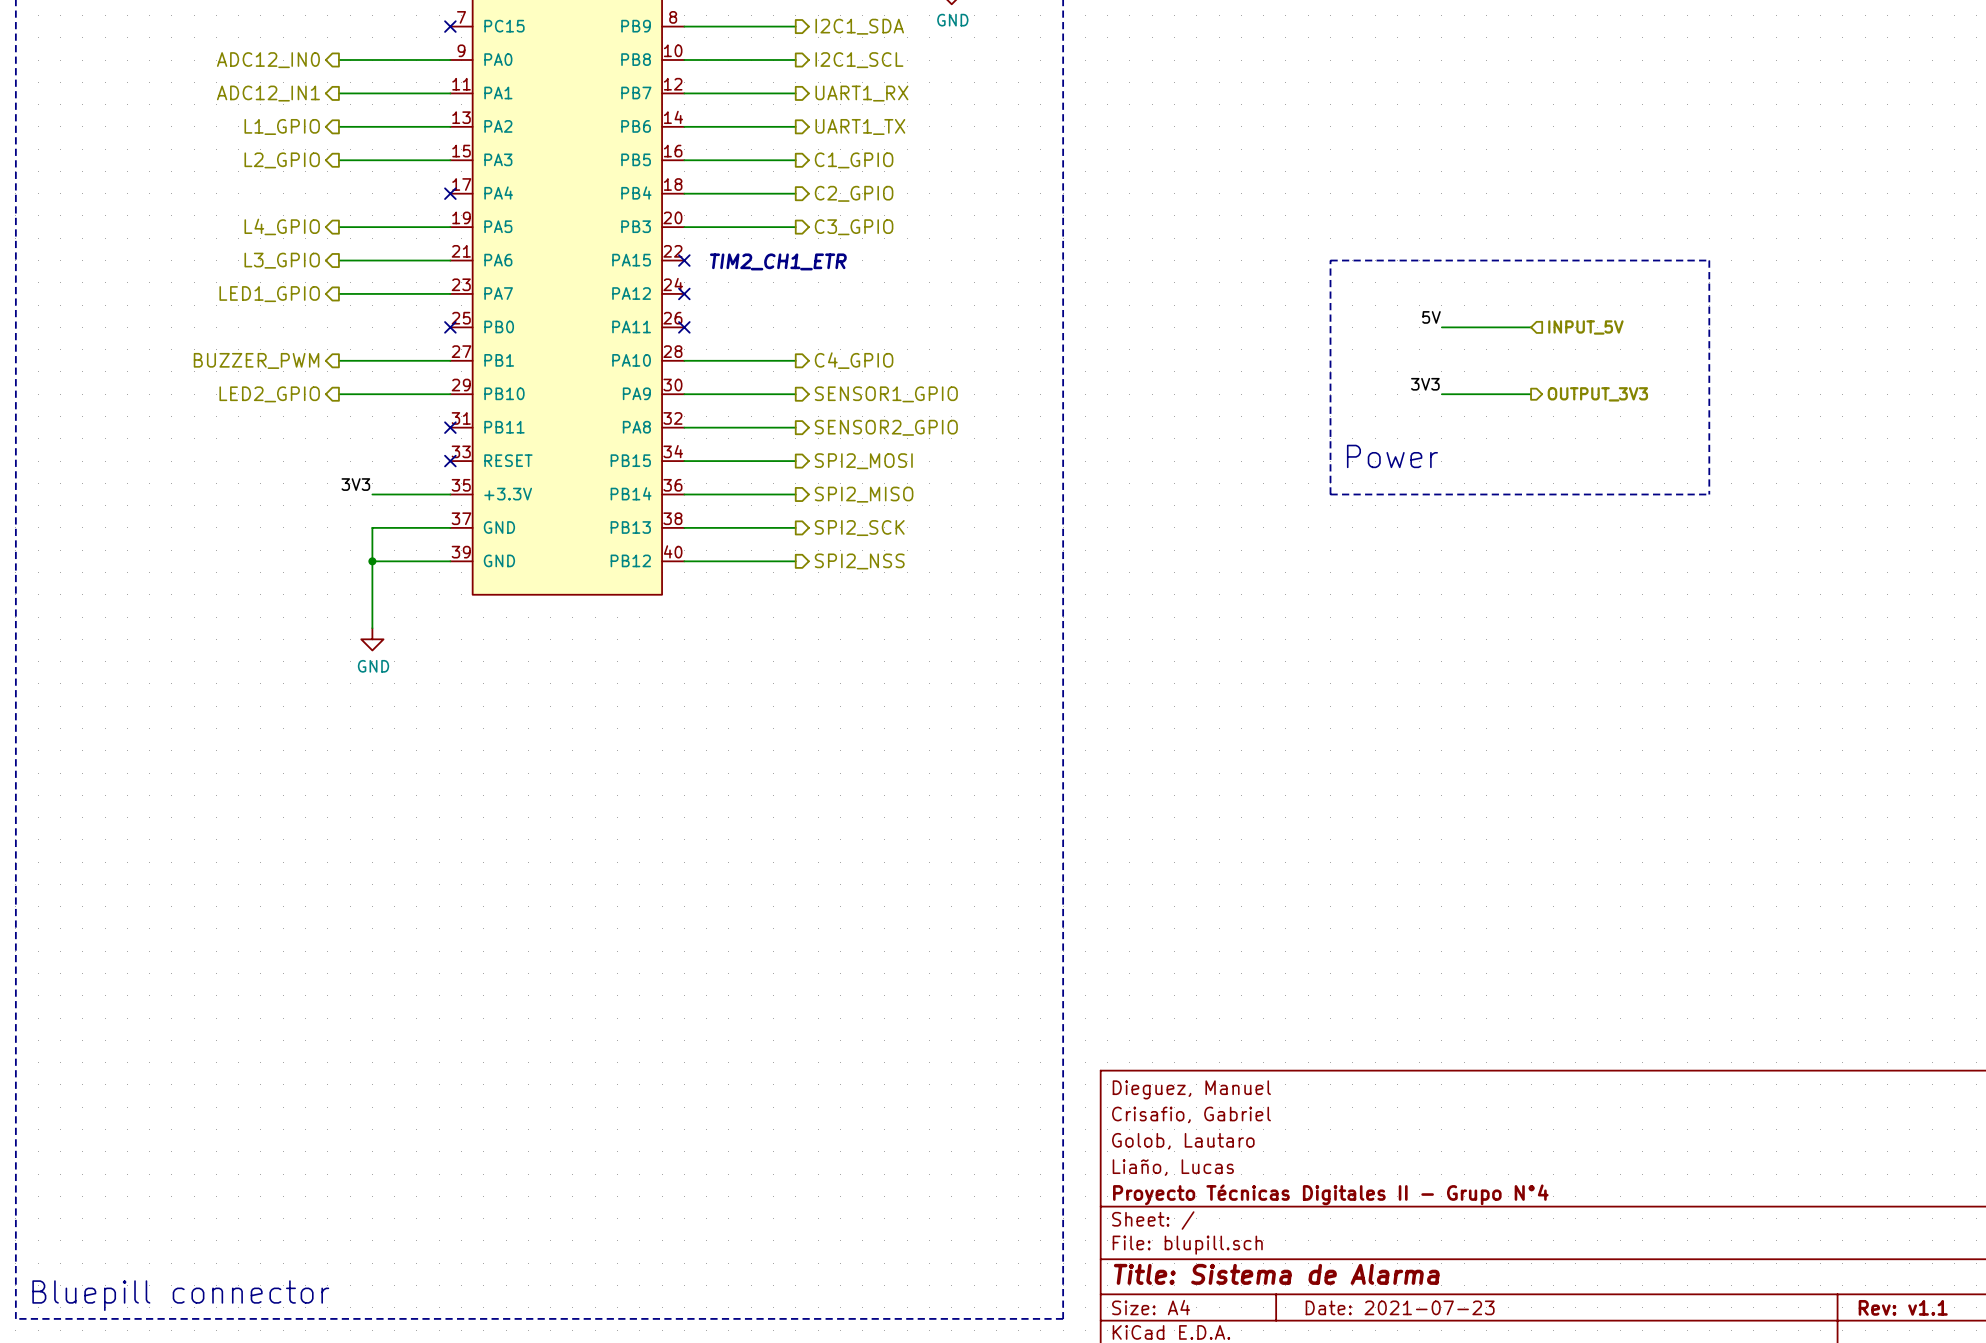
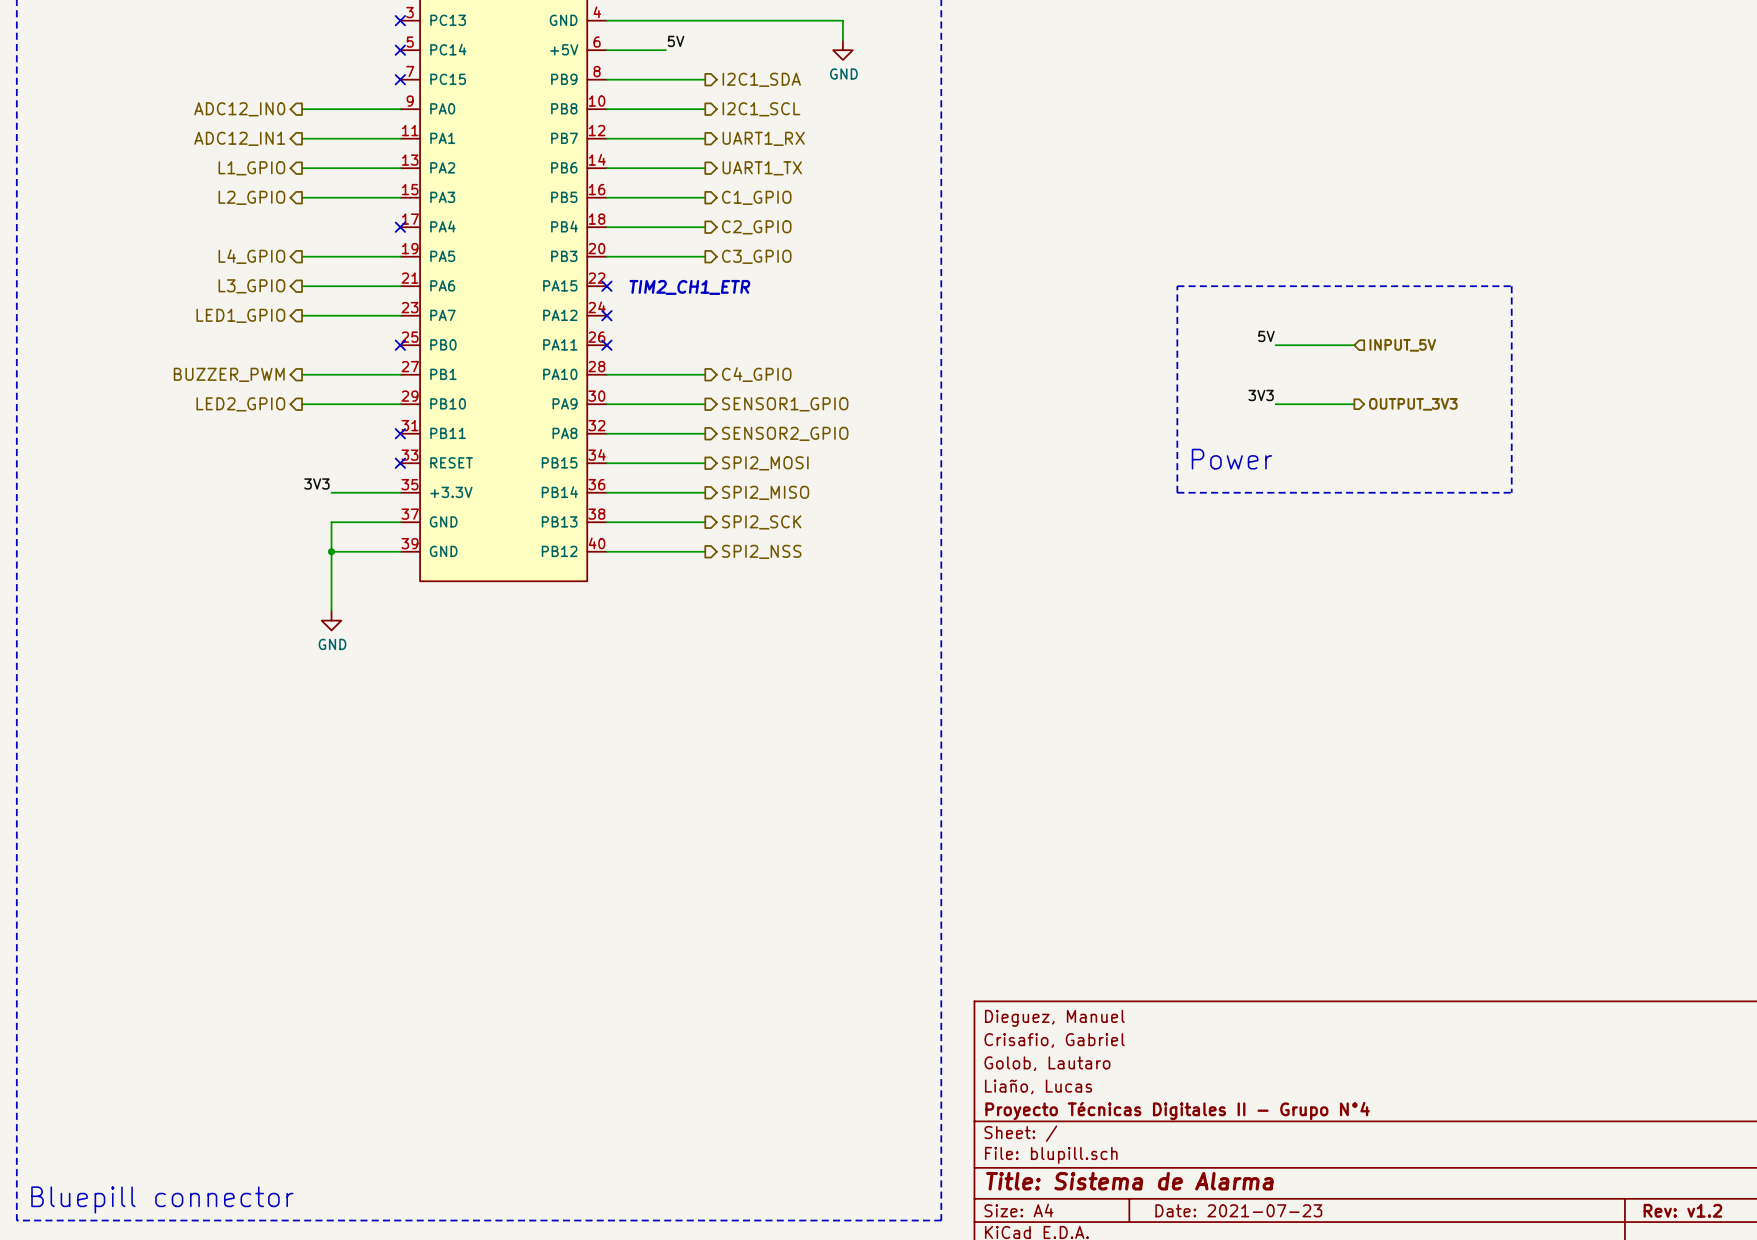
title block: Rev: v1.1 (1903, 1307) -> Rev: v1.2 (1682, 1210)

